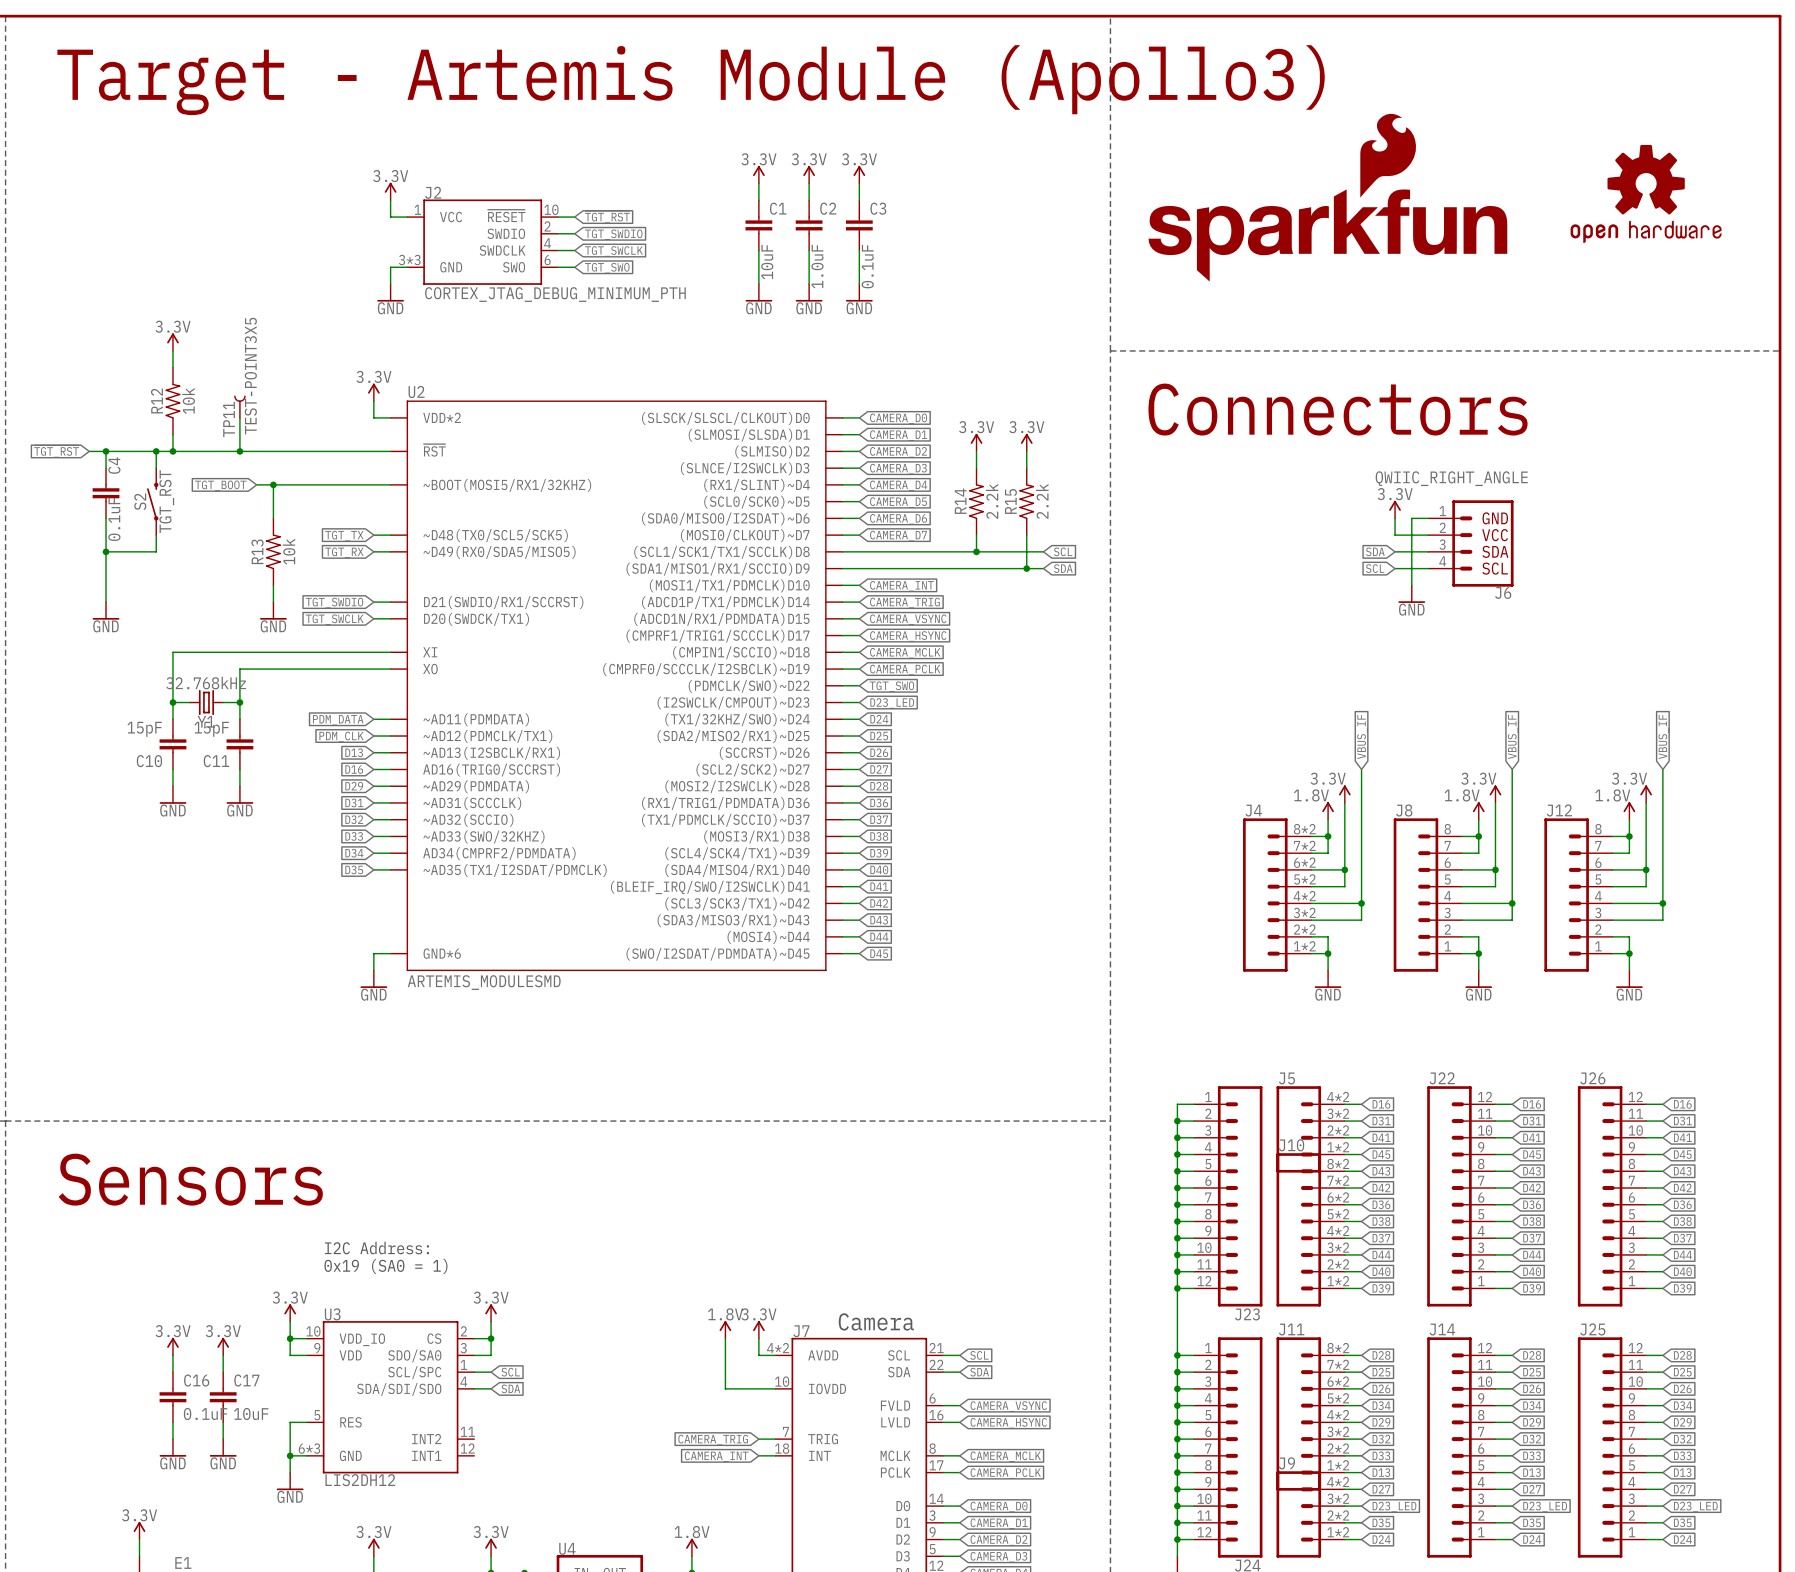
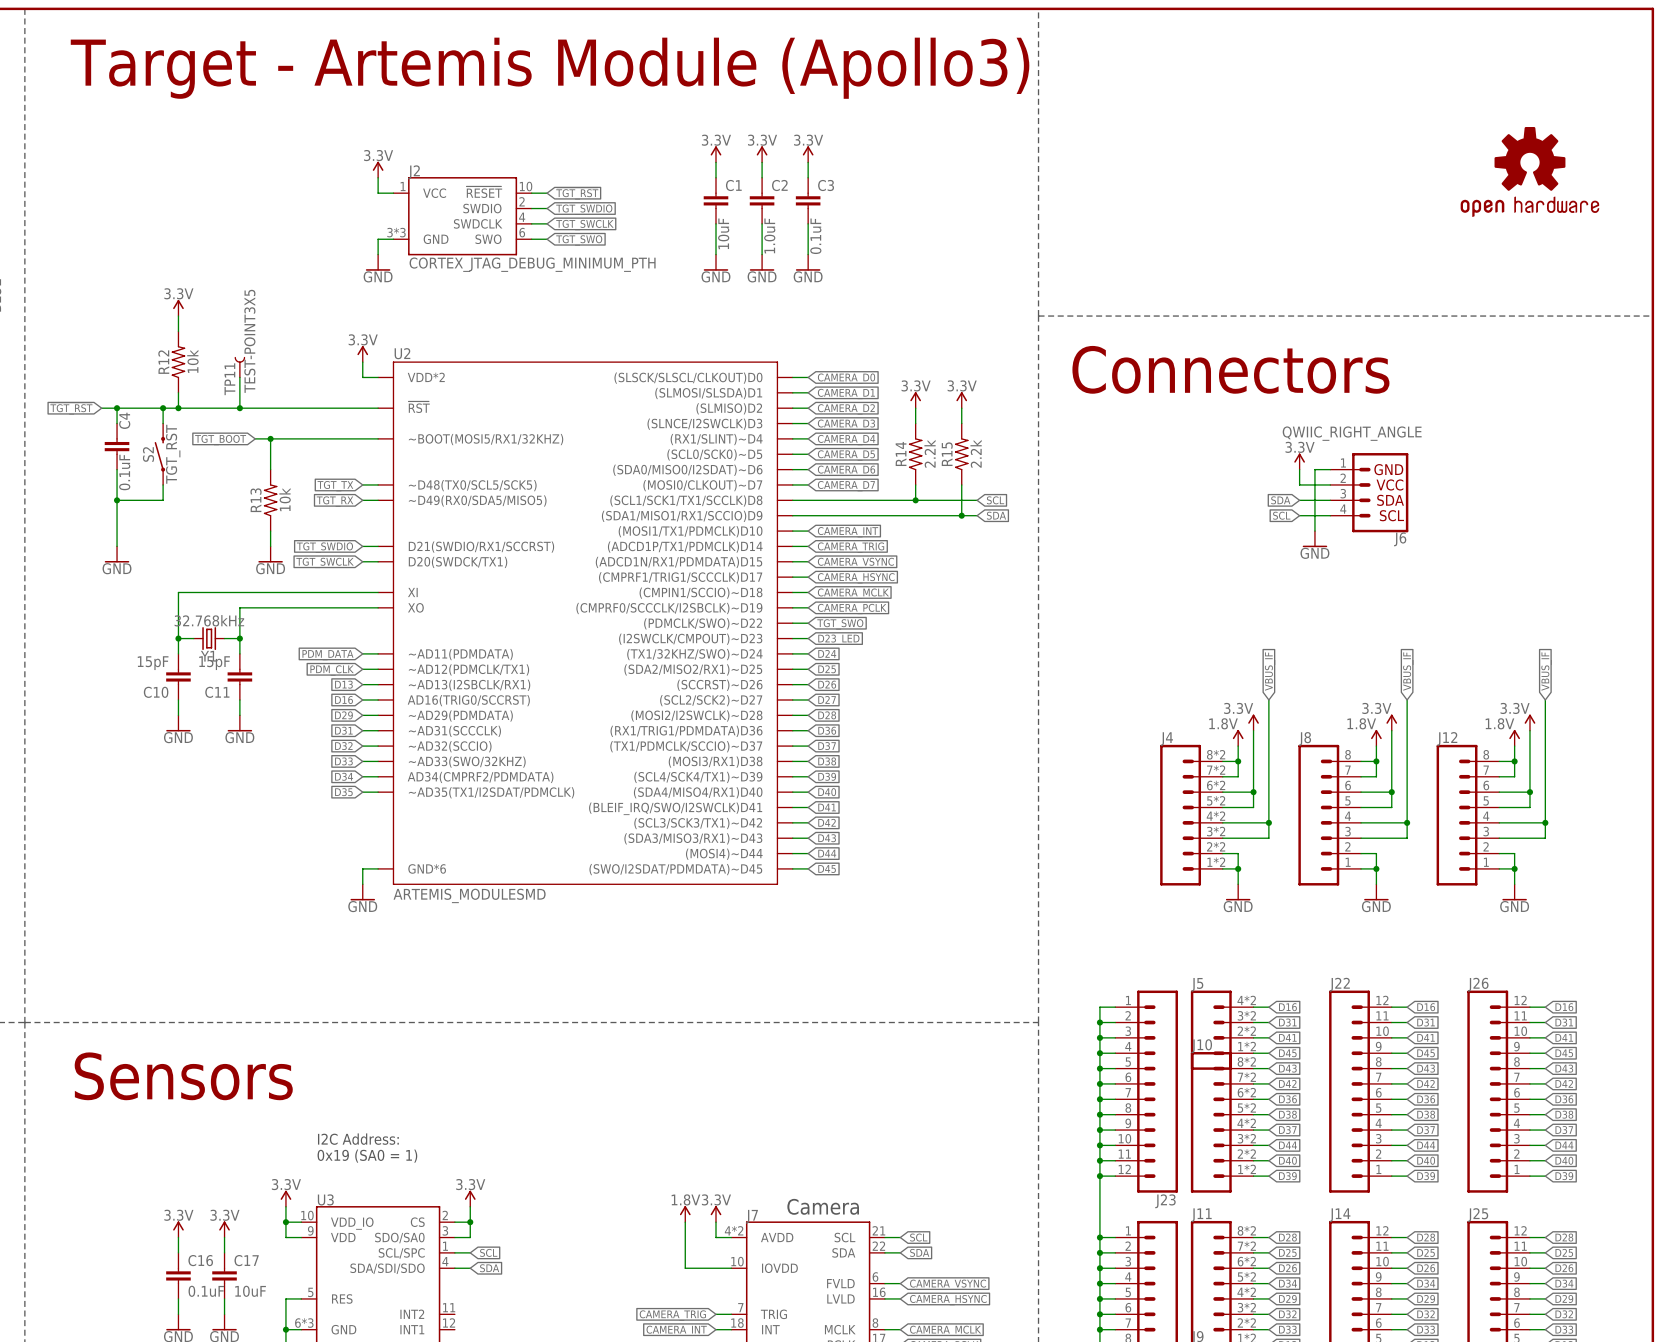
part: (1327, 197) -> none

